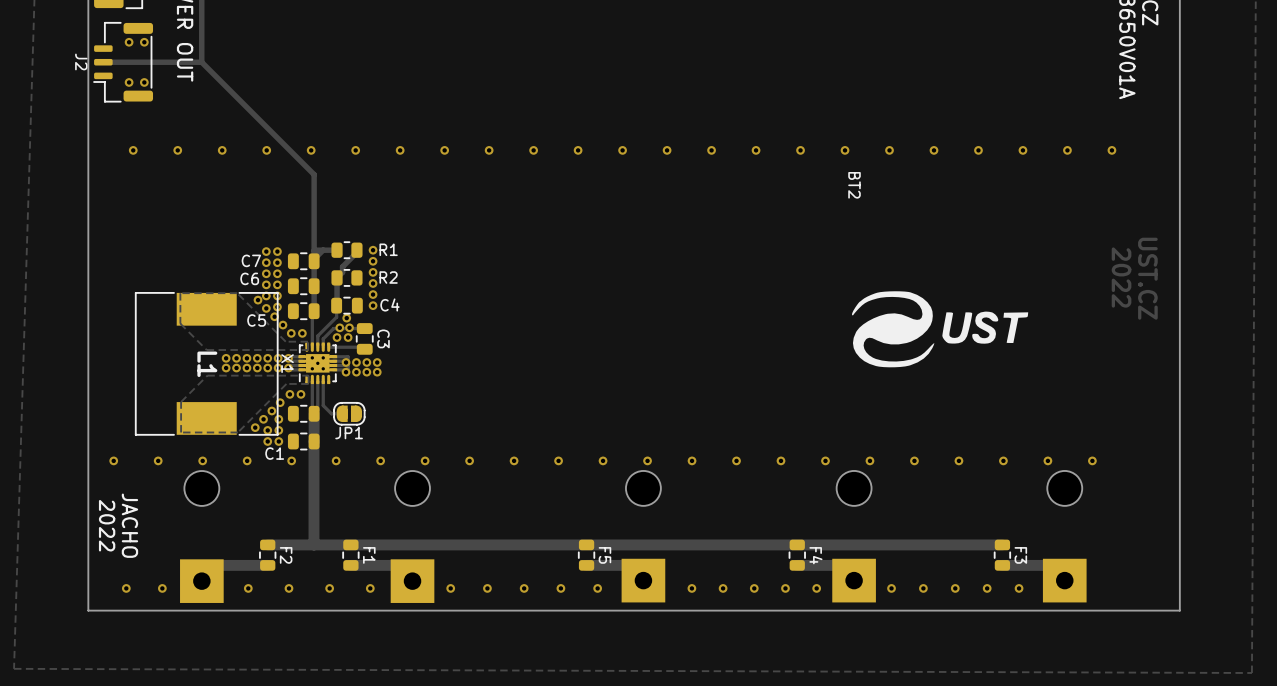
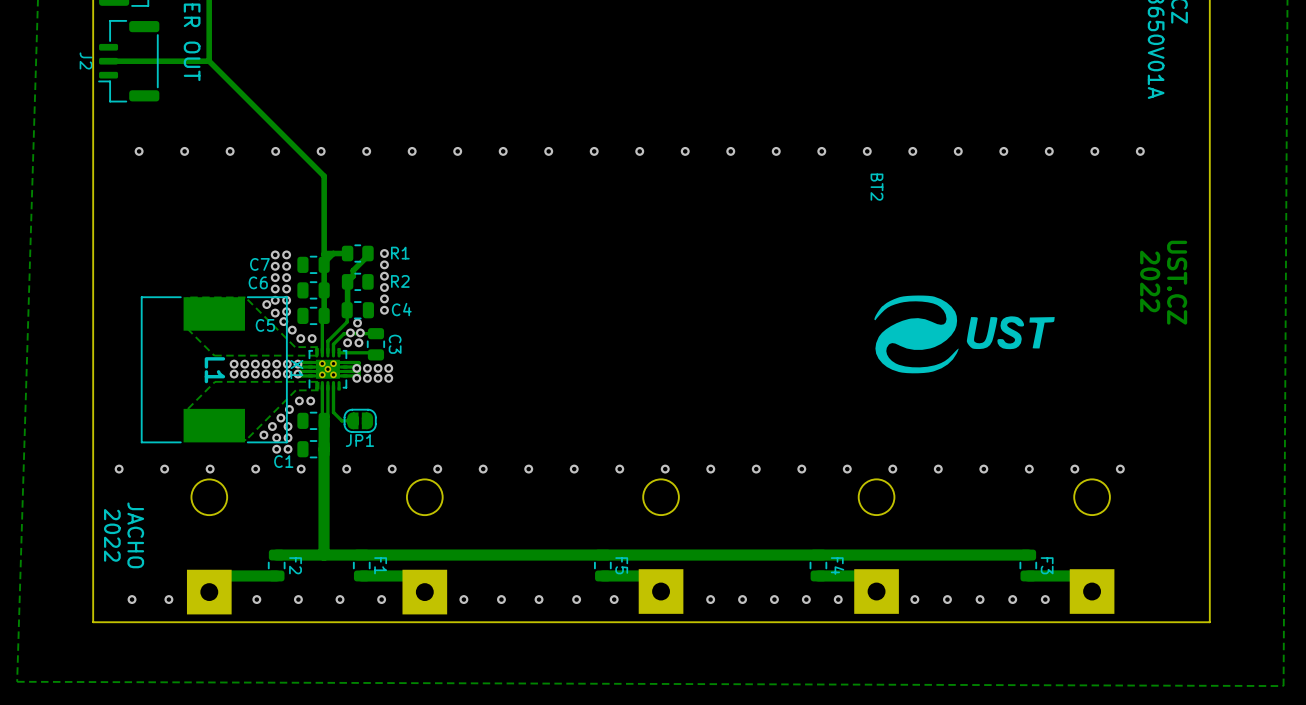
via: (129, 42) -> none
via: (144, 42) -> none
via: (129, 82) -> none
via: (144, 82) -> none

